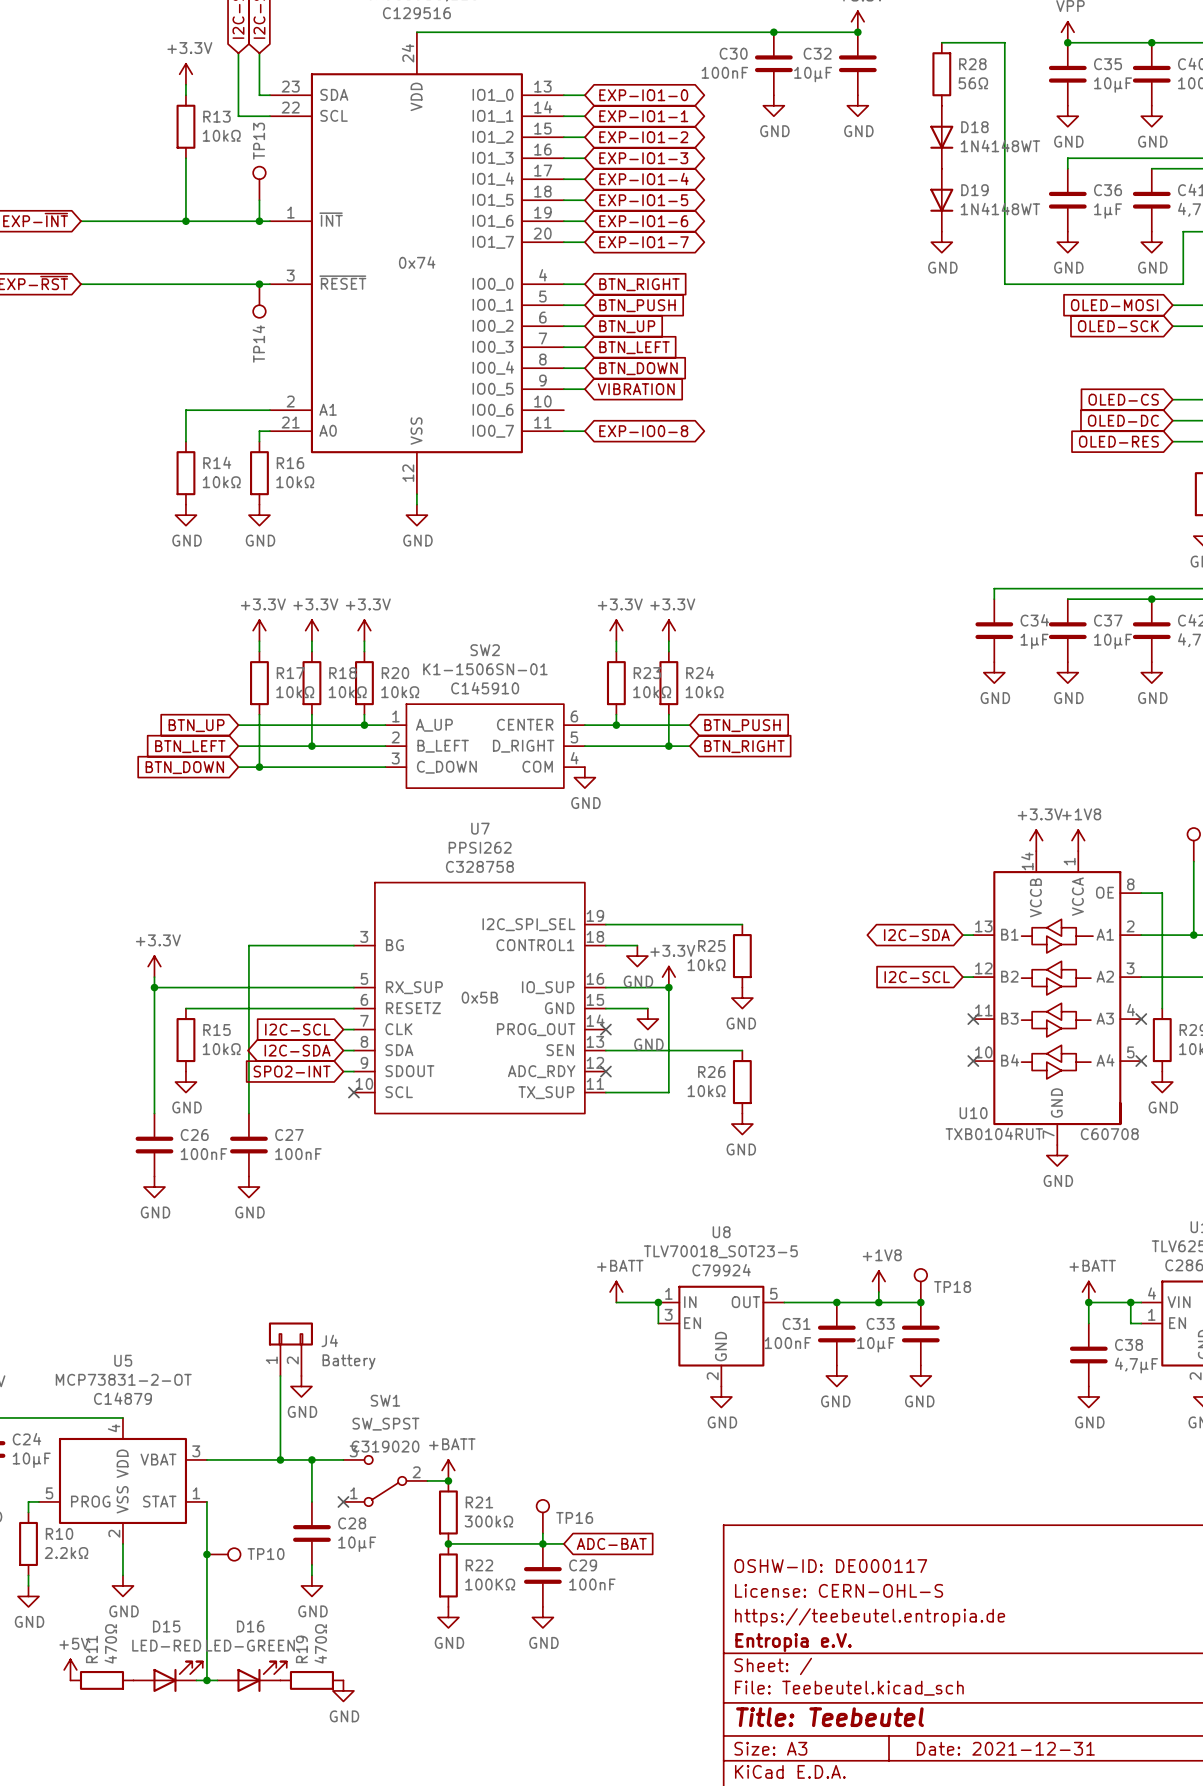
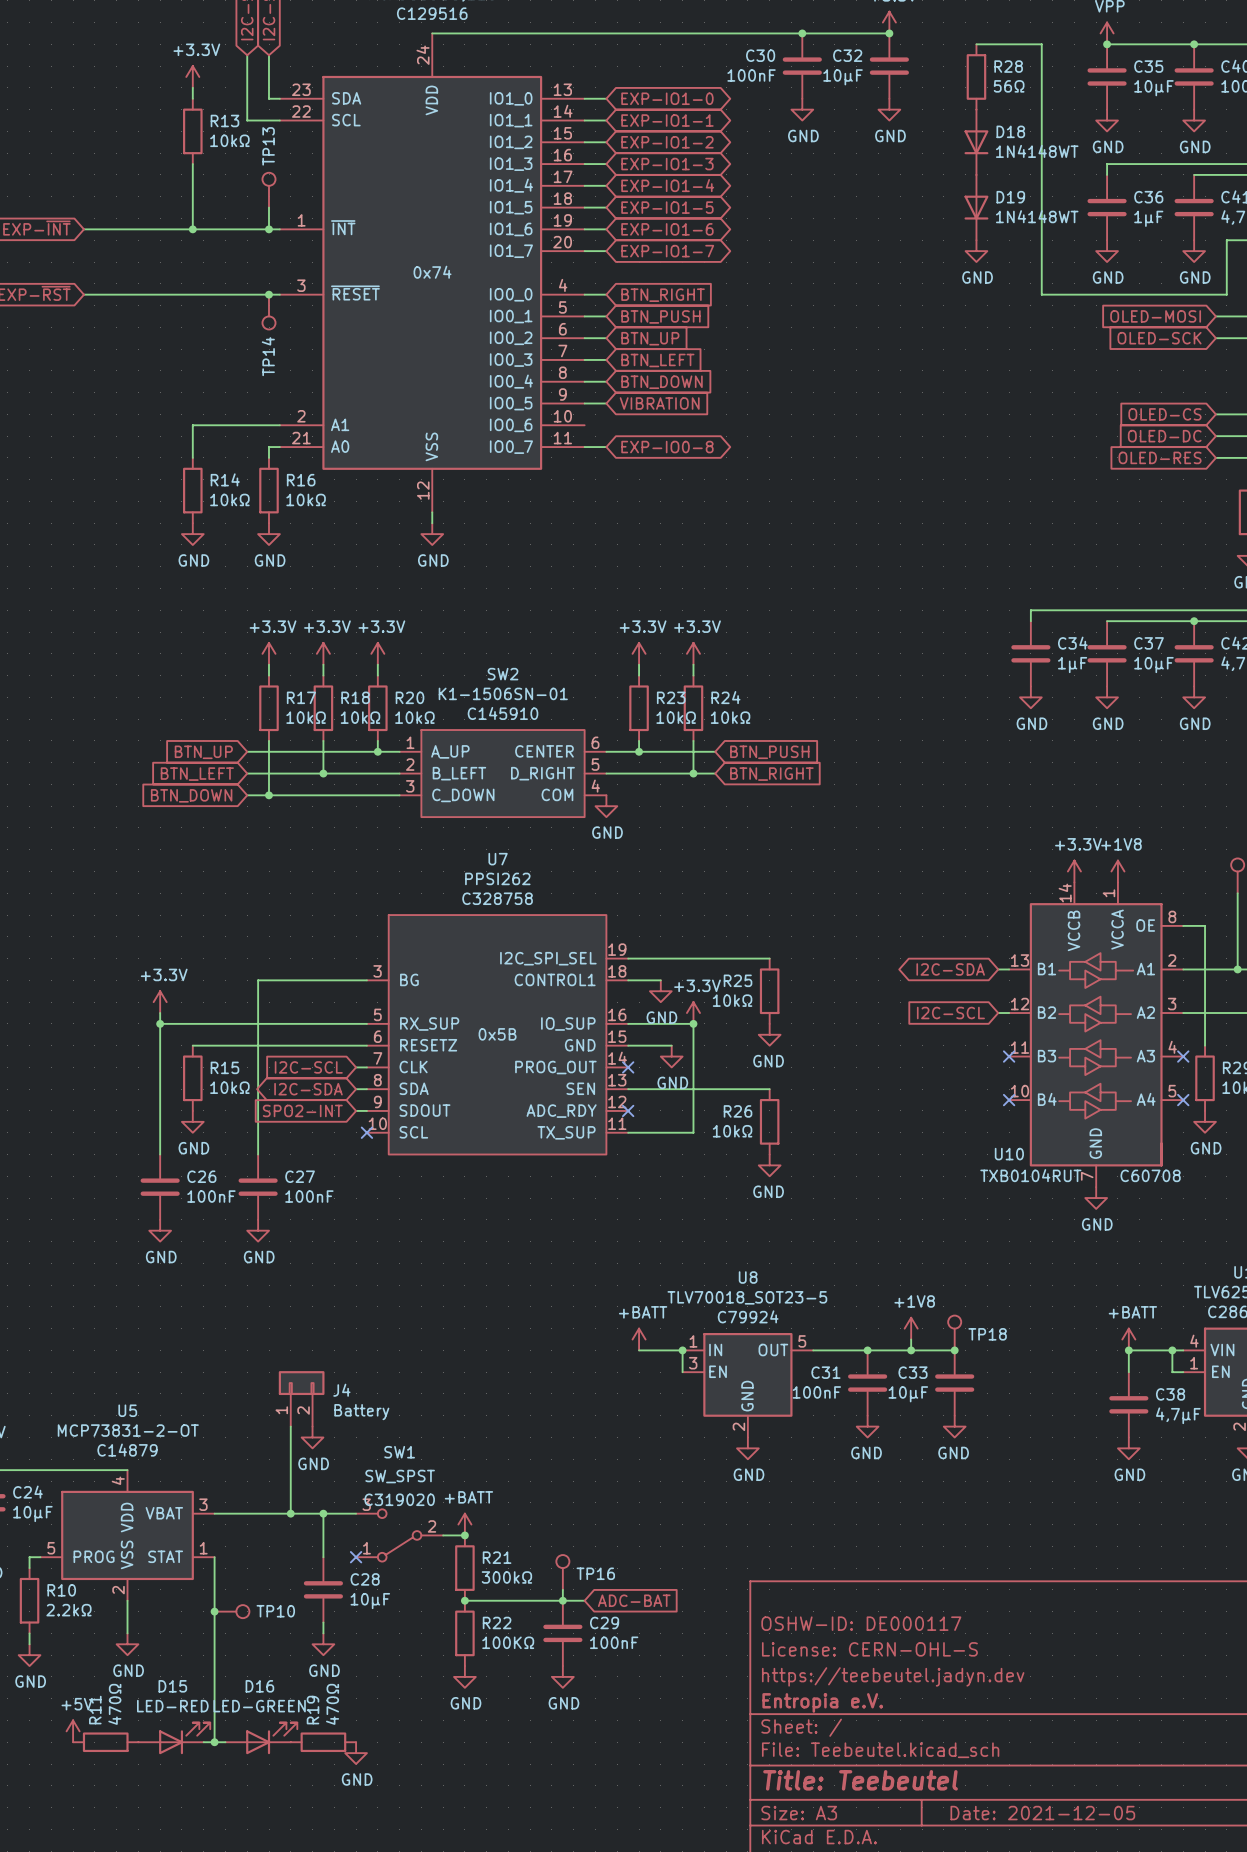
title block: https://teebeutel.entropia.de (870, 1617) -> https://teebeutel.jadyn.dev (893, 1676)
title block: Date: 2021-12-31 (1005, 1748) -> Date: 2021-12-05 (1042, 1813)

